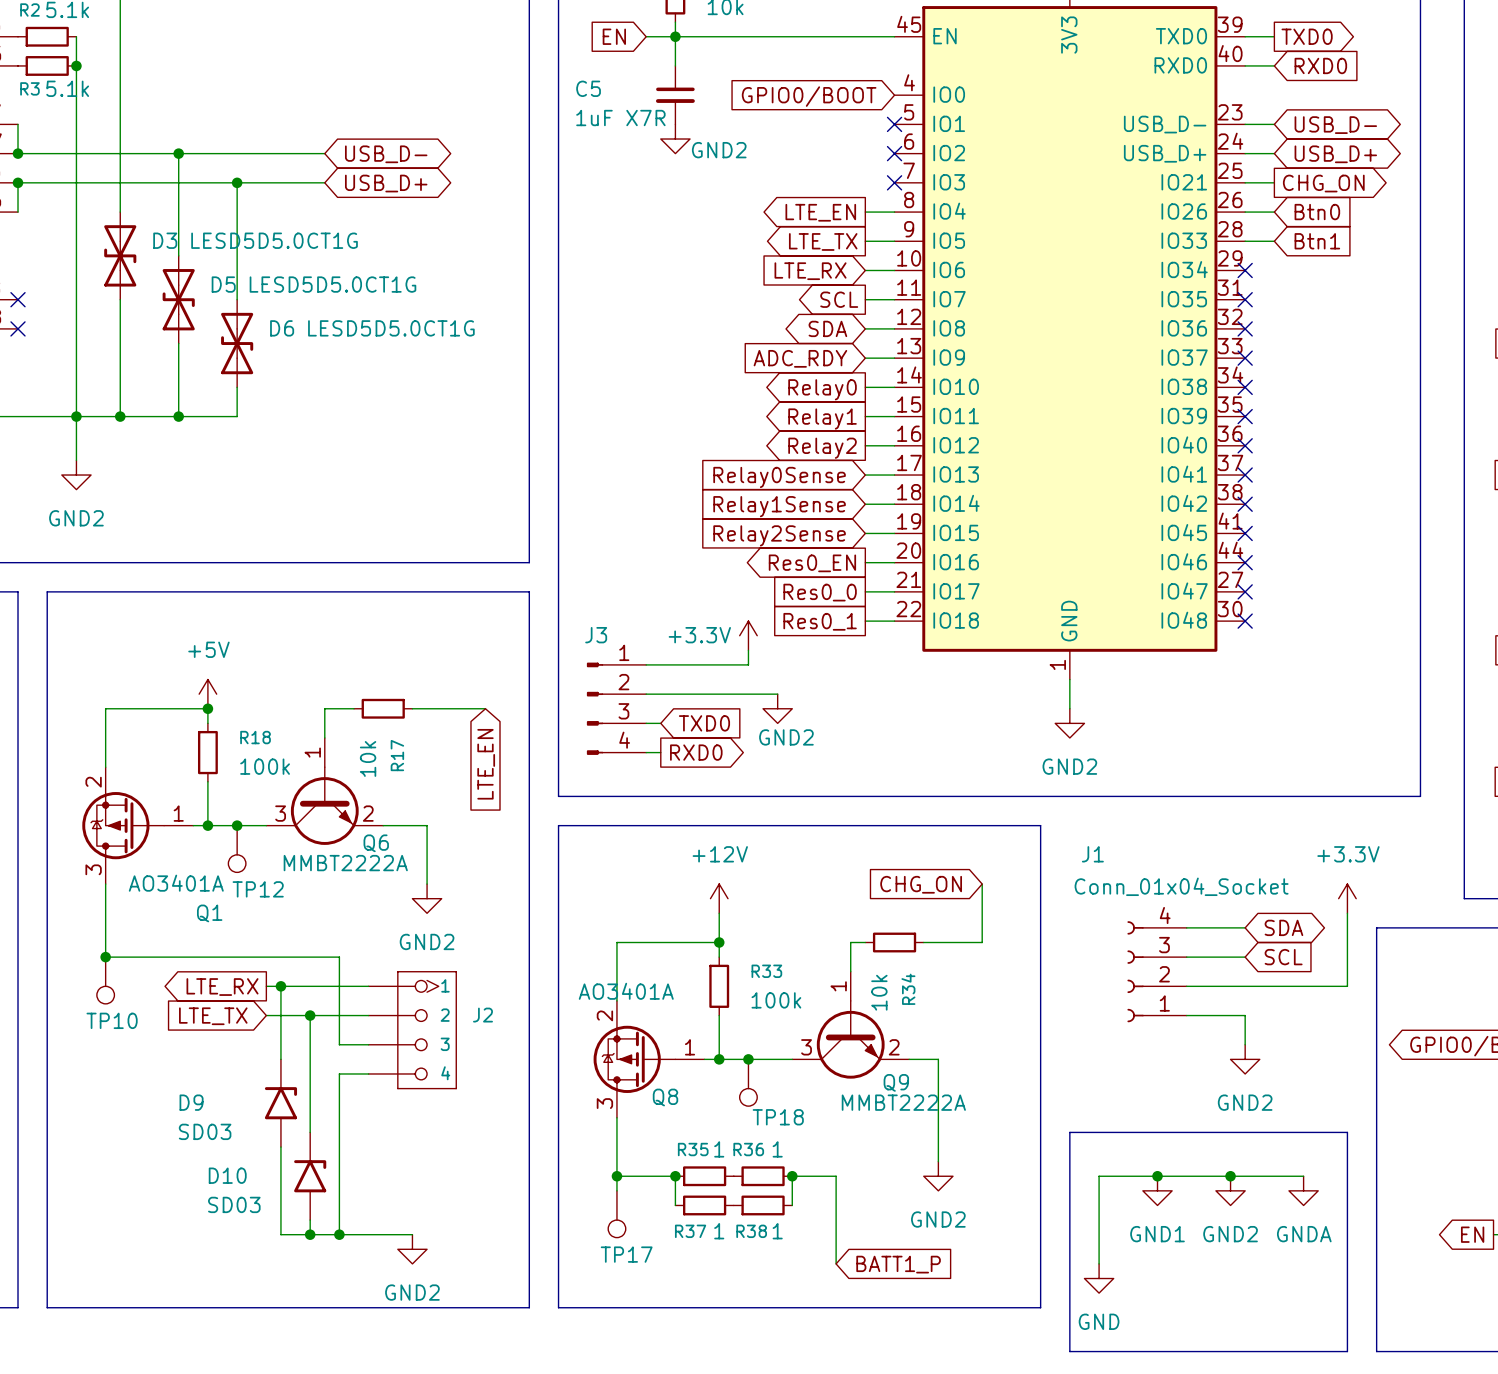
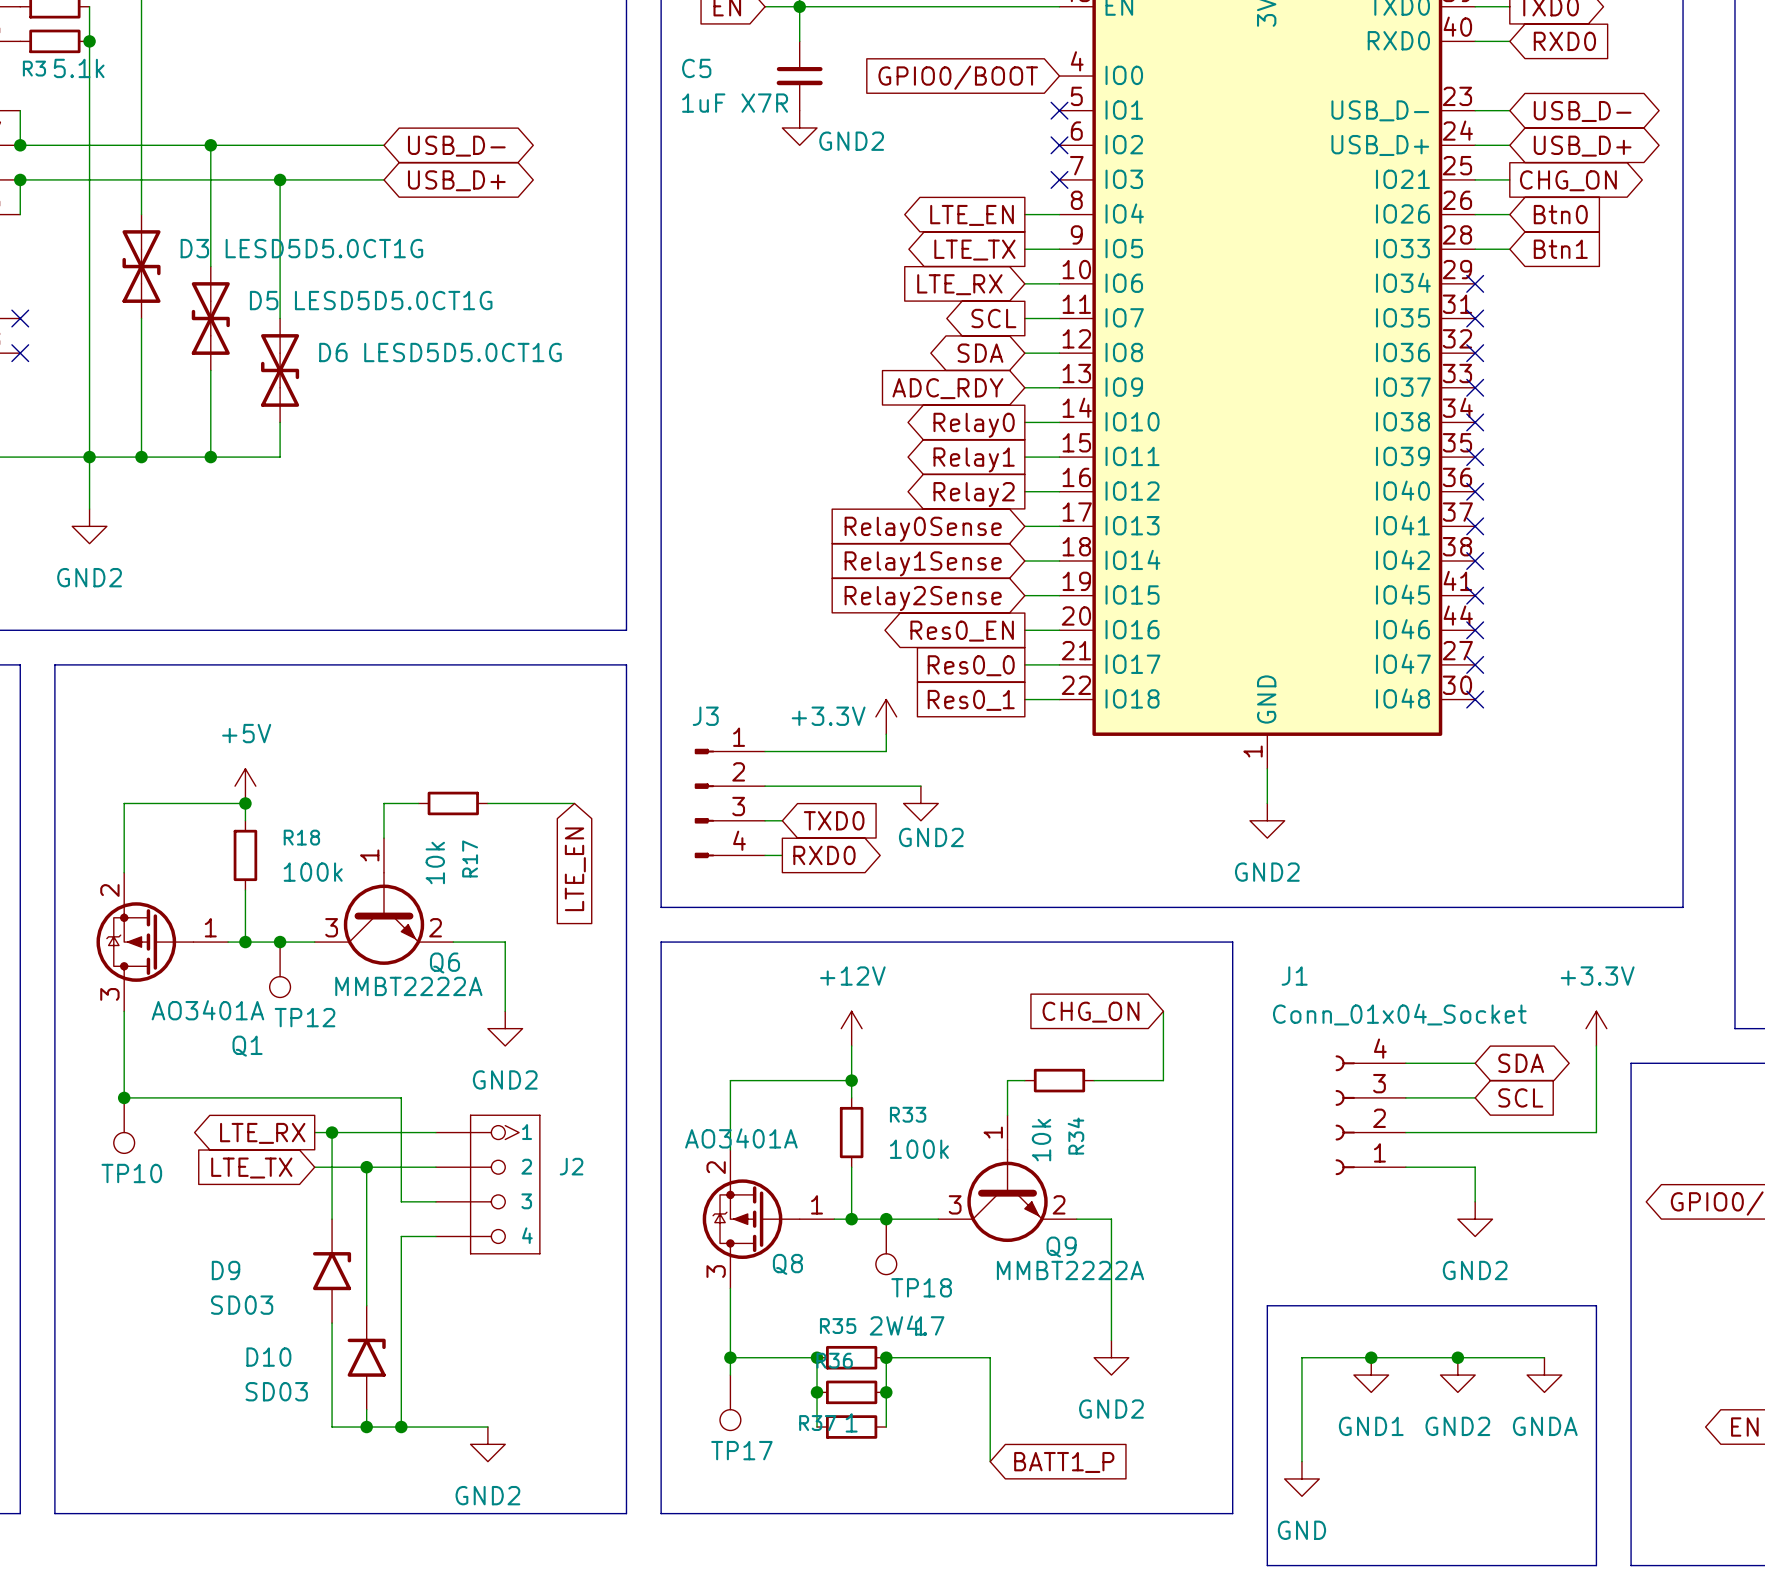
R35 value: 1 (719, 1149) -> 2W4.7 (907, 1325)
wire: (675, 1176) (675, 1205) -> (799, 1357) (817, 1357) (817, 1427)
junction position: (675, 1176) -> (817, 1357)
R35 position: (704, 1176) -> (851, 1357)
junction: none -> (886, 1357)
R36 position: (763, 1176) -> (851, 1392)
wire: (792, 1176) (792, 1205) -> (938, 1357) (886, 1357) (886, 1427)
junction: (792, 1176) -> none
junction: none -> (817, 1392)
R37 position: (704, 1205) -> (851, 1427)
junction: none -> (886, 1392)
R38: 1 (763, 1205) -> none

